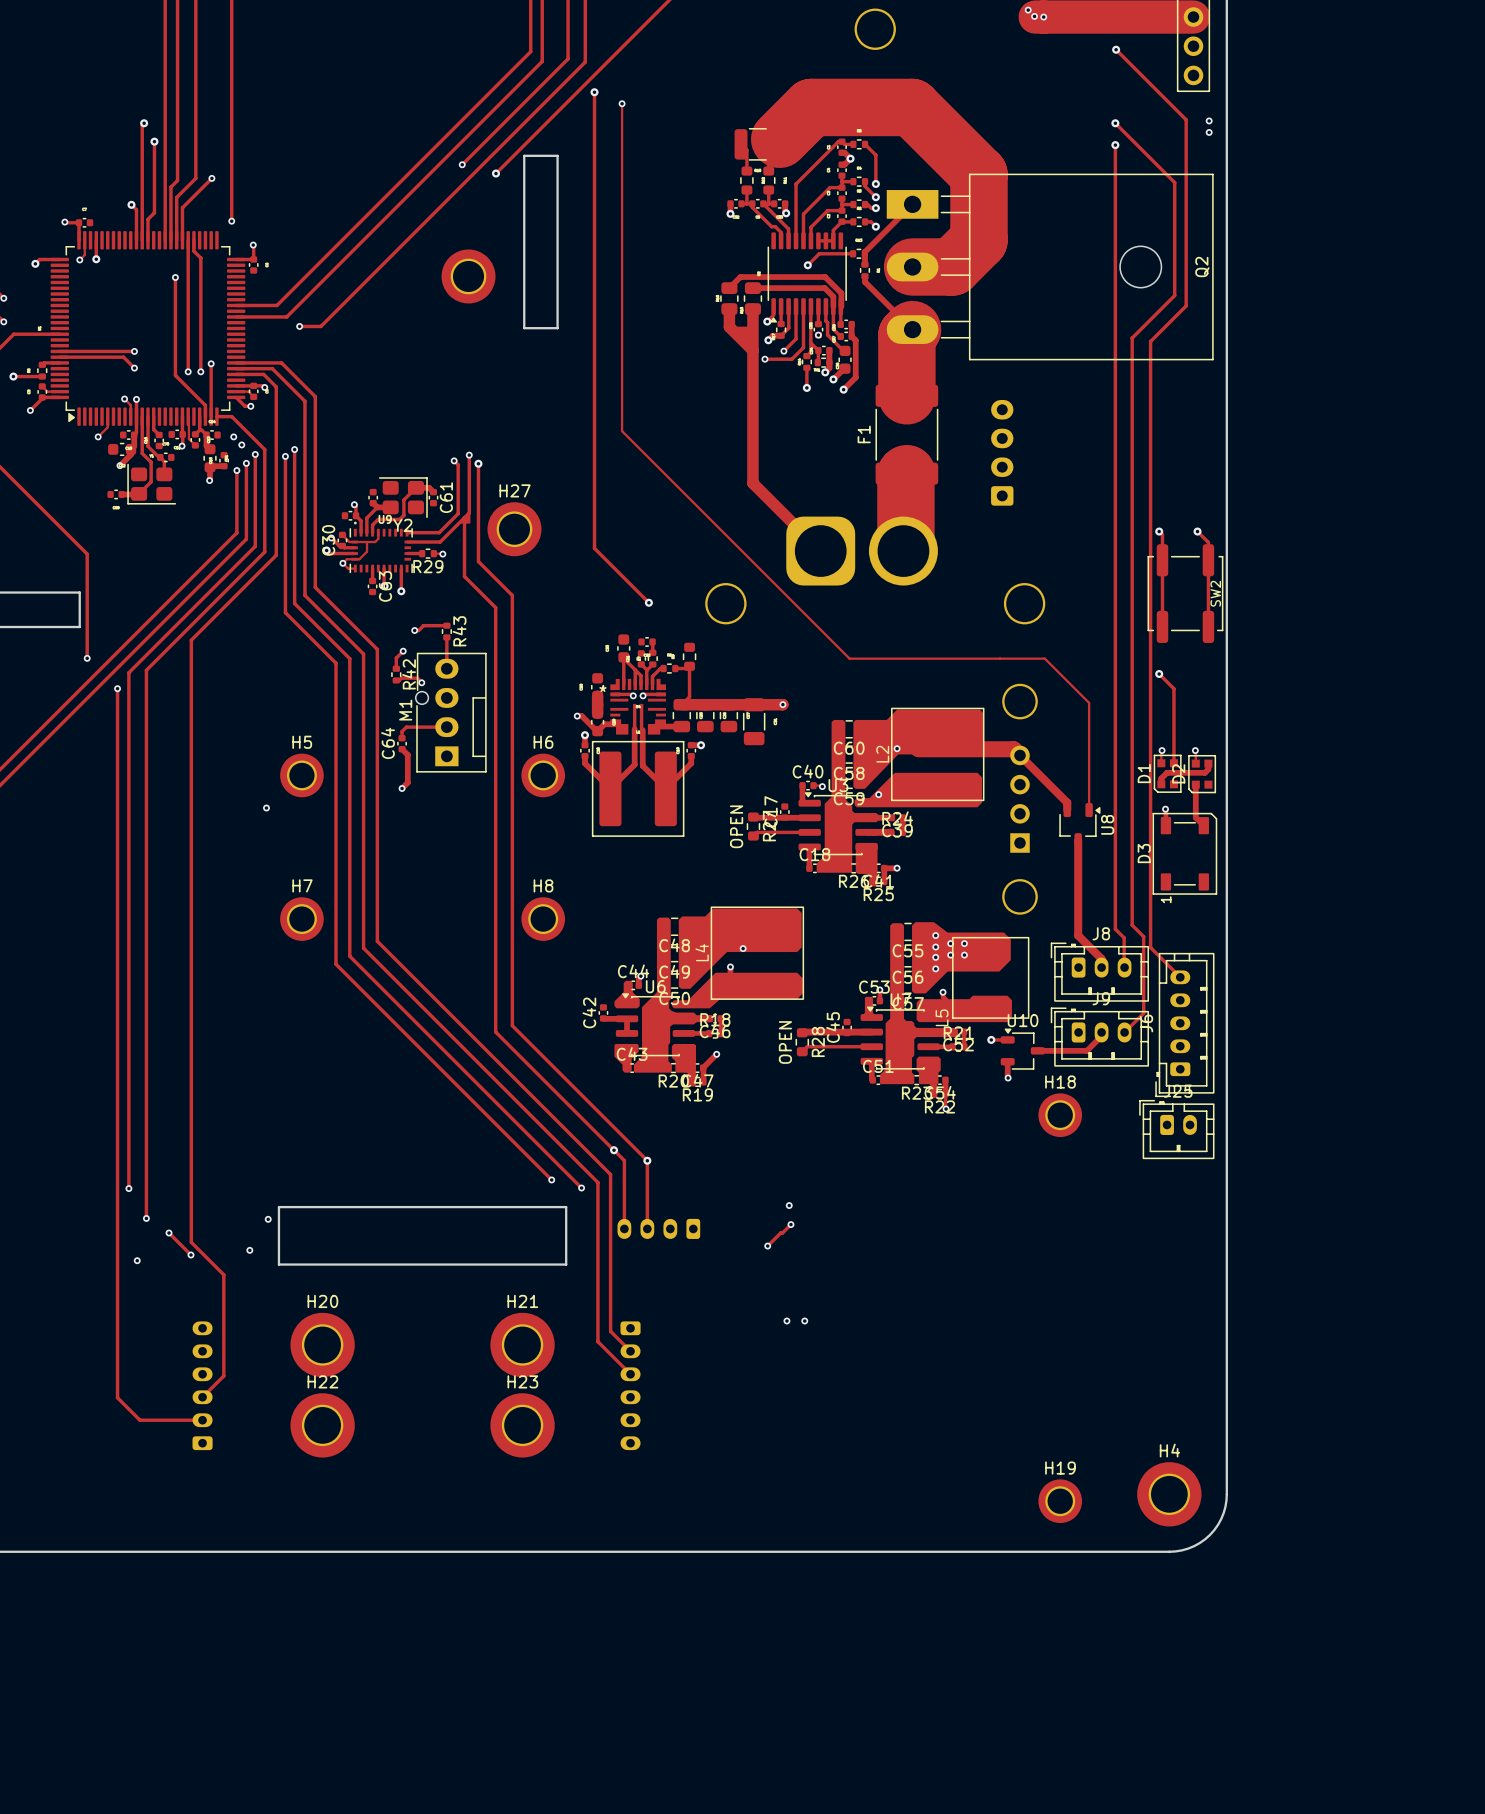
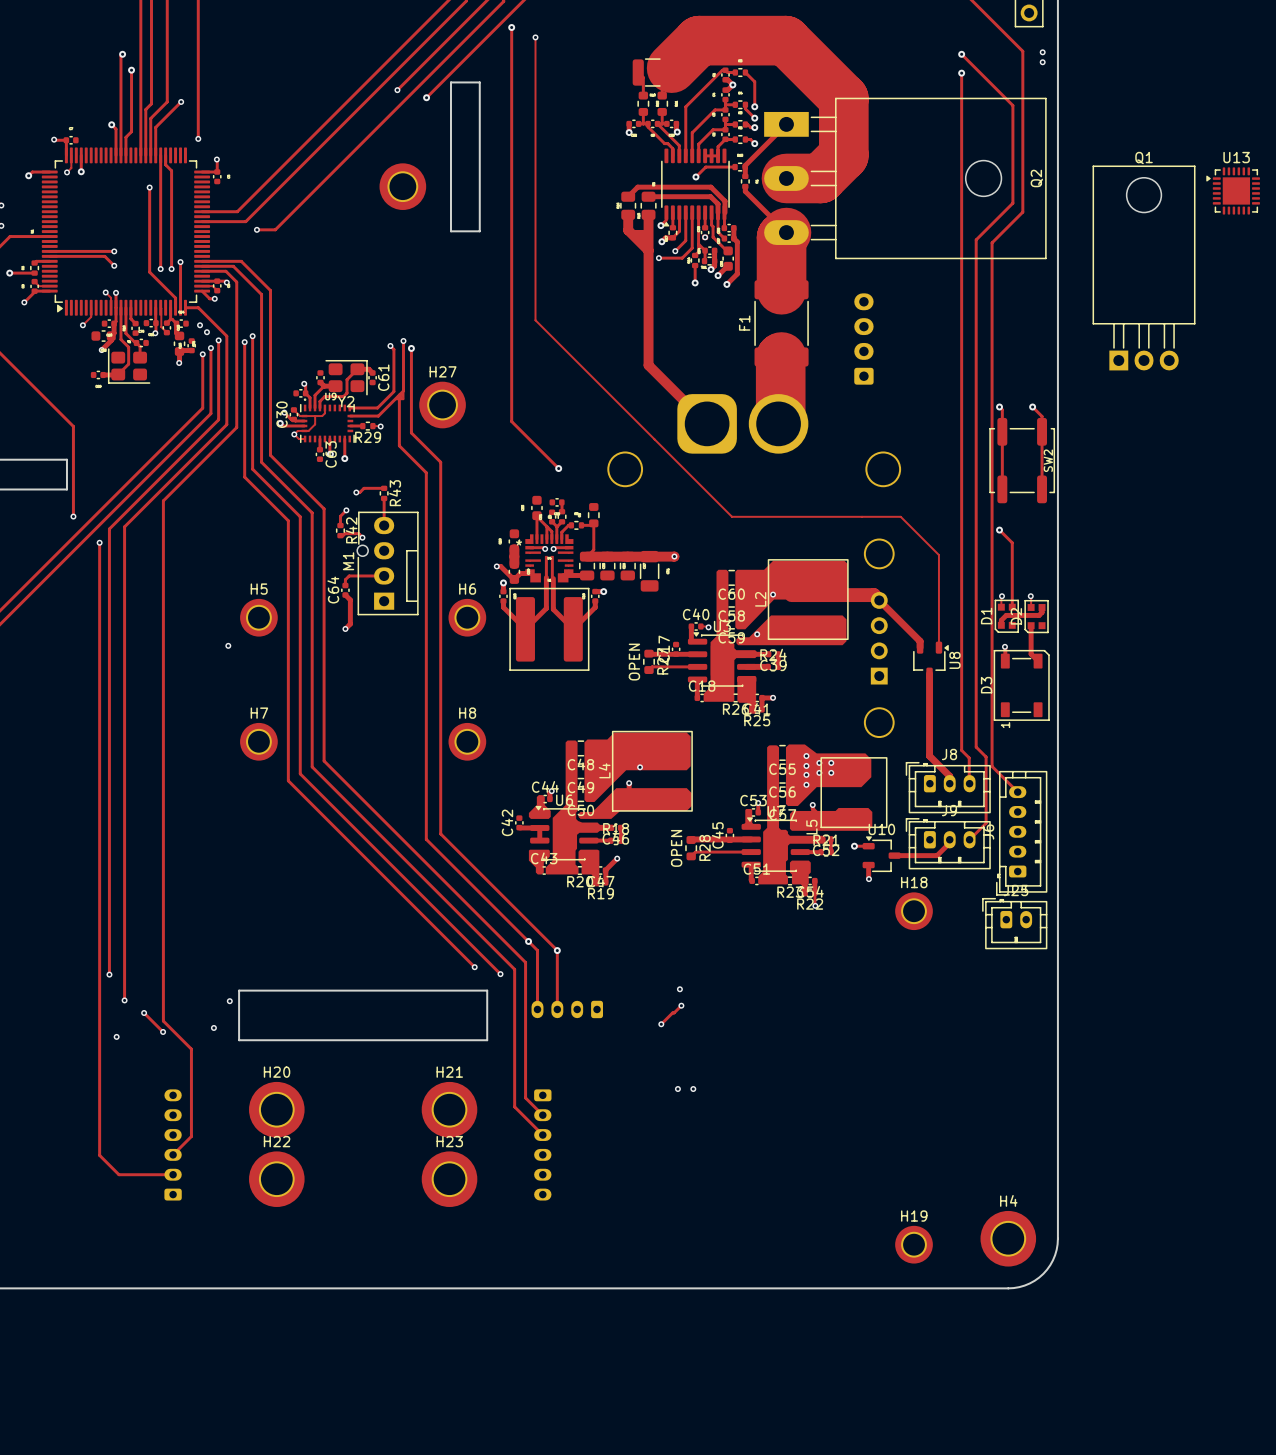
U13: none -> (1233, 190)
Q1: none -> (1144, 268)

